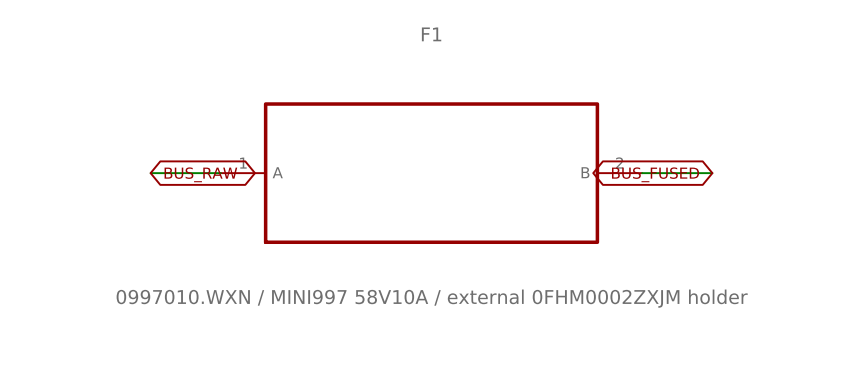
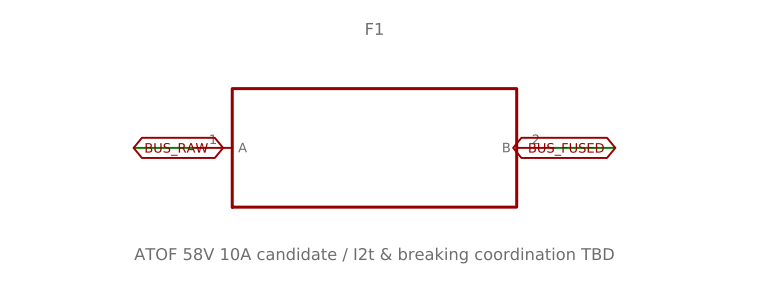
F1 value: 0997010.WXN / MINI997 58V10A / external 0FHM0002ZXJM holder (432, 298) -> ATOF 58V 10A candidate / I2t & breaking coordination TBD (374, 255)

